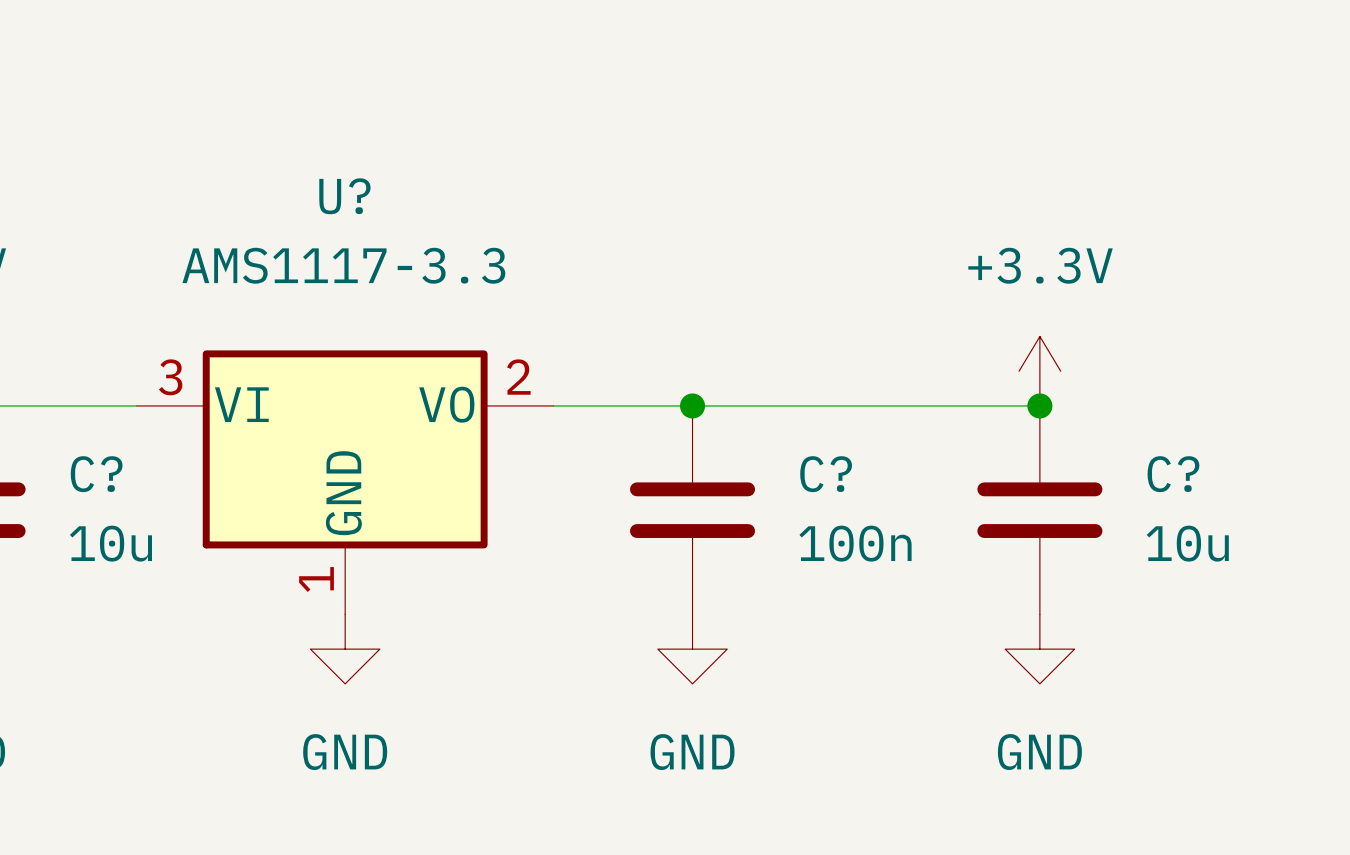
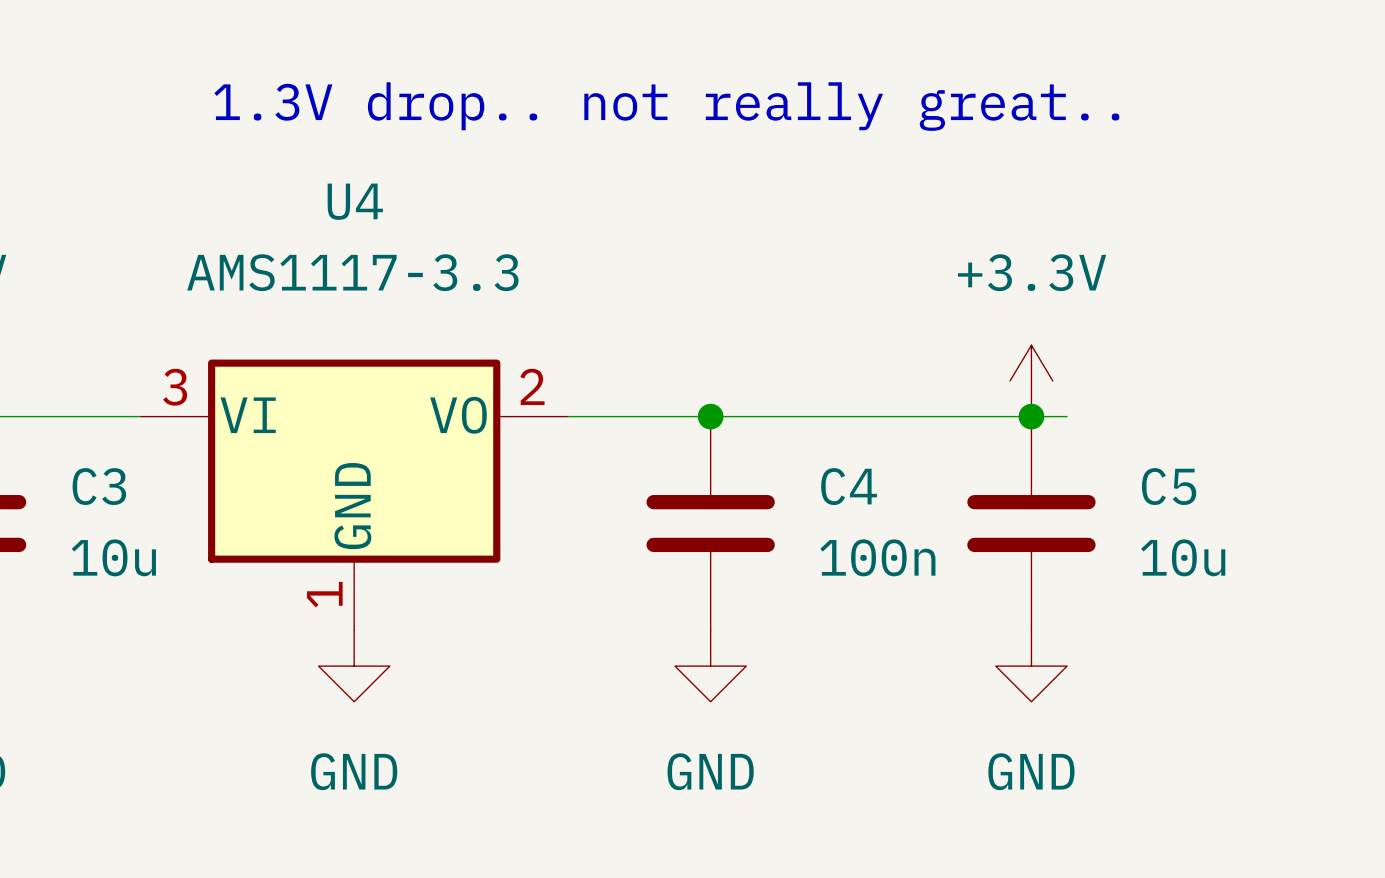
text: none -> 1.3V drop.. not really great.. (666, 106)
U? name: U? (344, 196) -> U4 (355, 201)
power symbol position: +3.3V (1039, 371) -> +3.3V (1031, 380)
junction position: (1039, 405) -> (1031, 416)
C? name: C? (96, 474) -> C3 (99, 486)
C? name: C? (826, 474) -> C4 (849, 486)
C5: none -> 10u (1031, 523)
C?: 10u (1039, 510) -> none
power symbol position: GND (1039, 649) -> GND (1031, 666)

